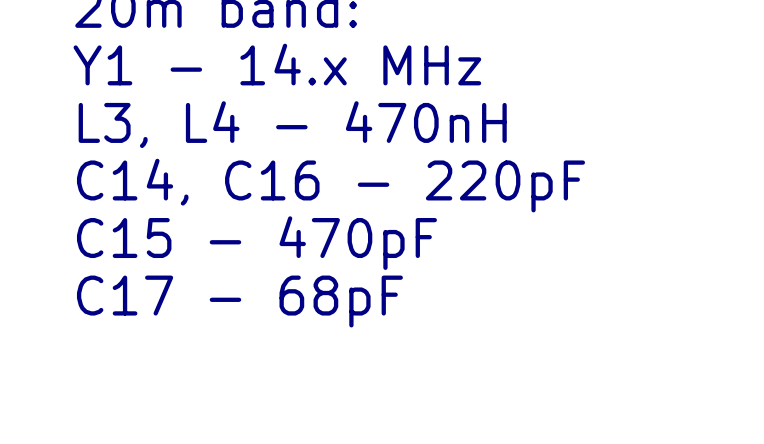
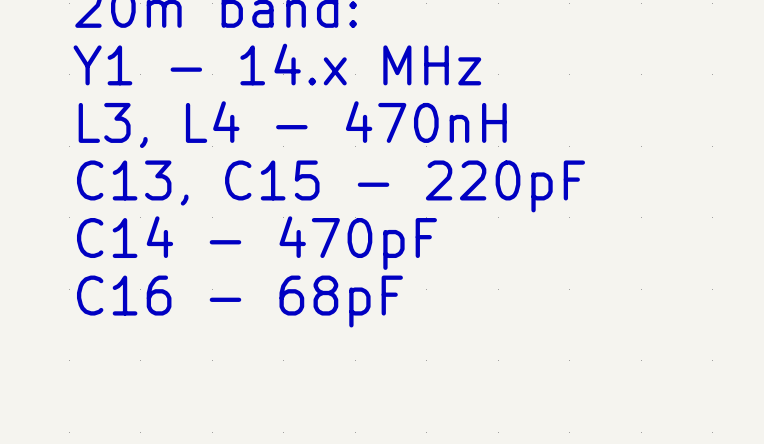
text: C14, C16 - 220pF (330, 185) -> C13, C15 - 220pF (330, 186)
text: C15 - 470pF (256, 243) -> C14 - 470pF (256, 243)
text: C17 - 68pF (239, 301) -> C16 - 68pF (239, 301)

